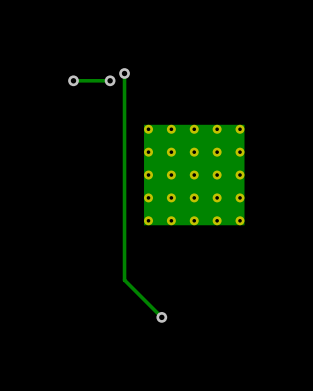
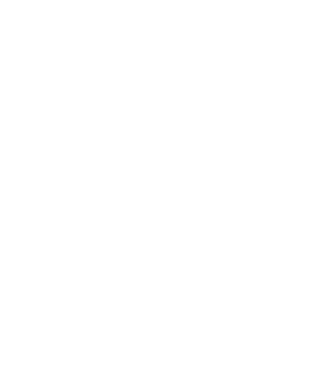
track: (124, 73) (124, 280) (161, 317) -> none
via: (124, 73) -> none
via: (73, 80) -> none
track: (110, 80) (73, 80) -> none
via: (110, 80) -> none
part: (194, 175) -> none
via: (161, 317) -> none

